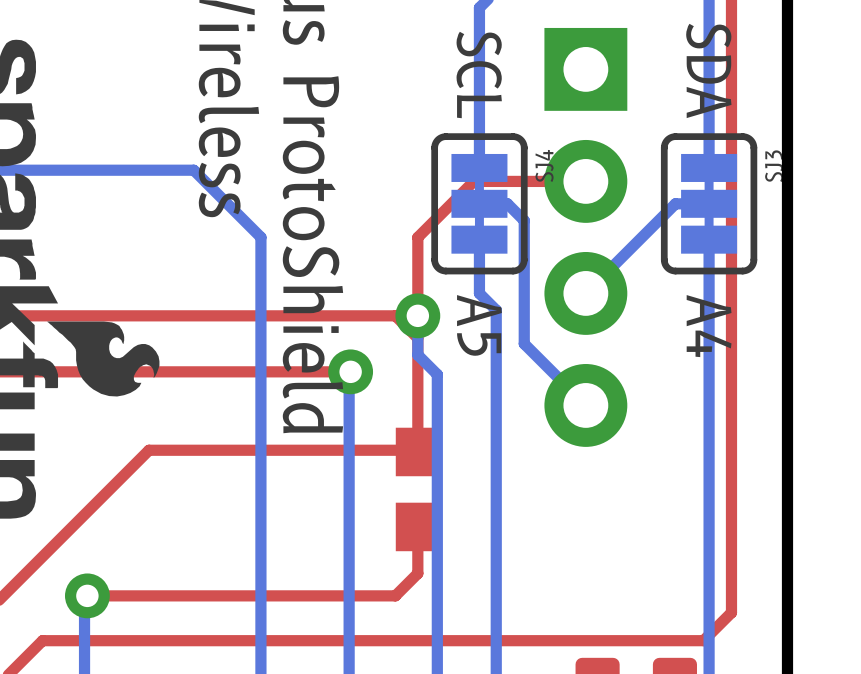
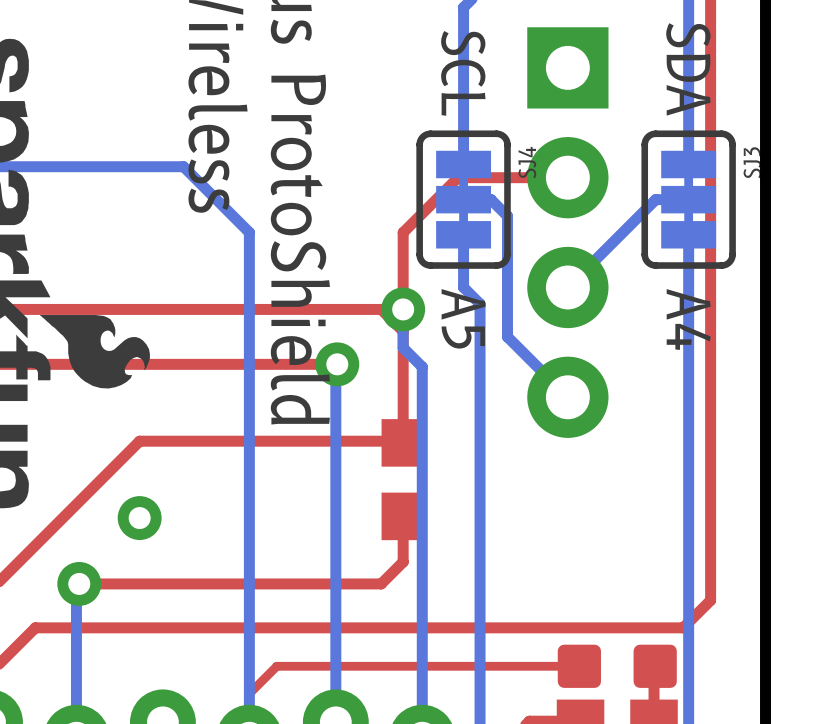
via: none -> (139, 518)

